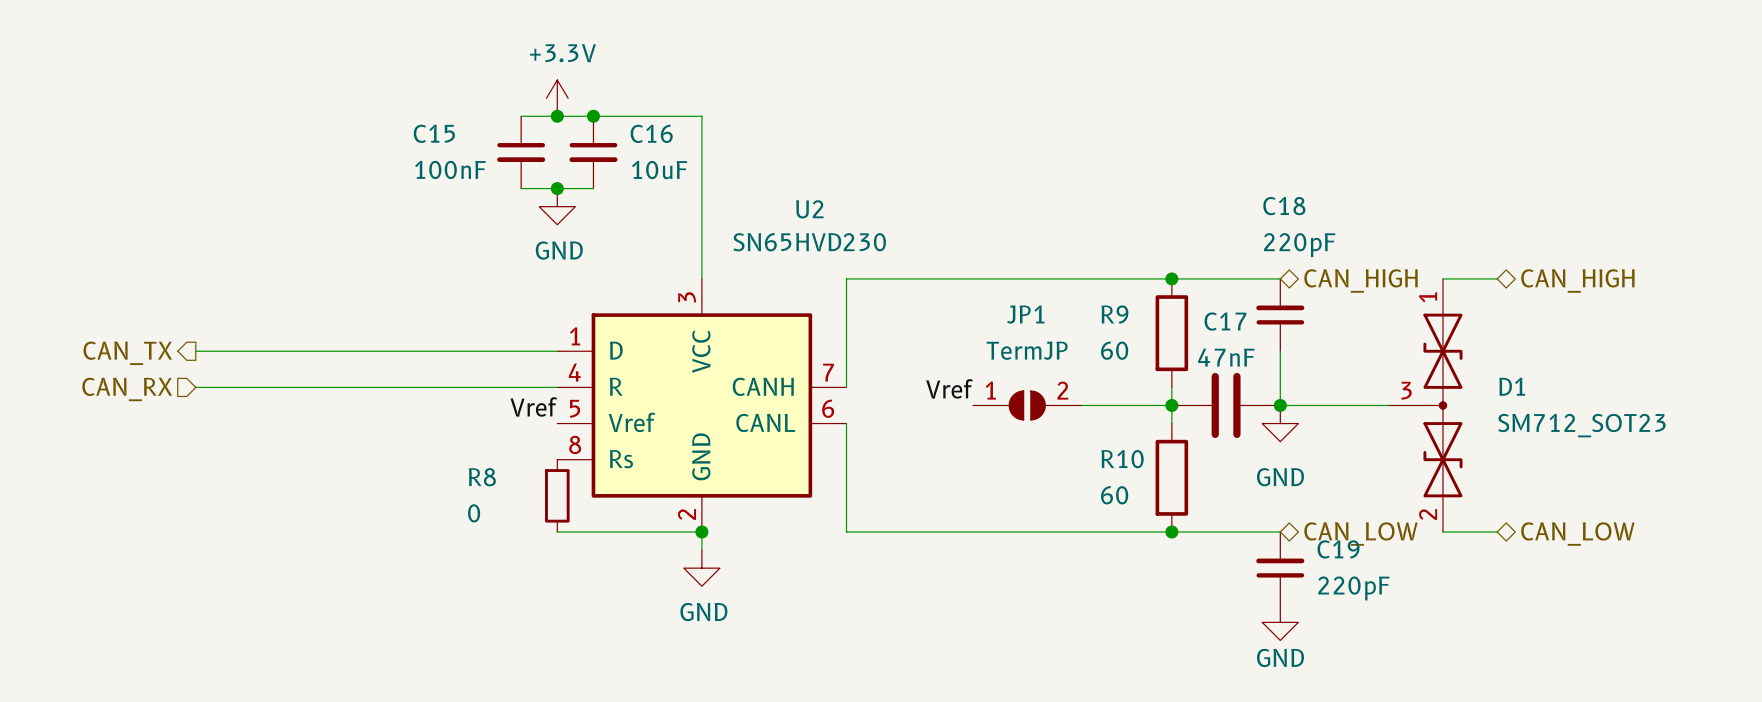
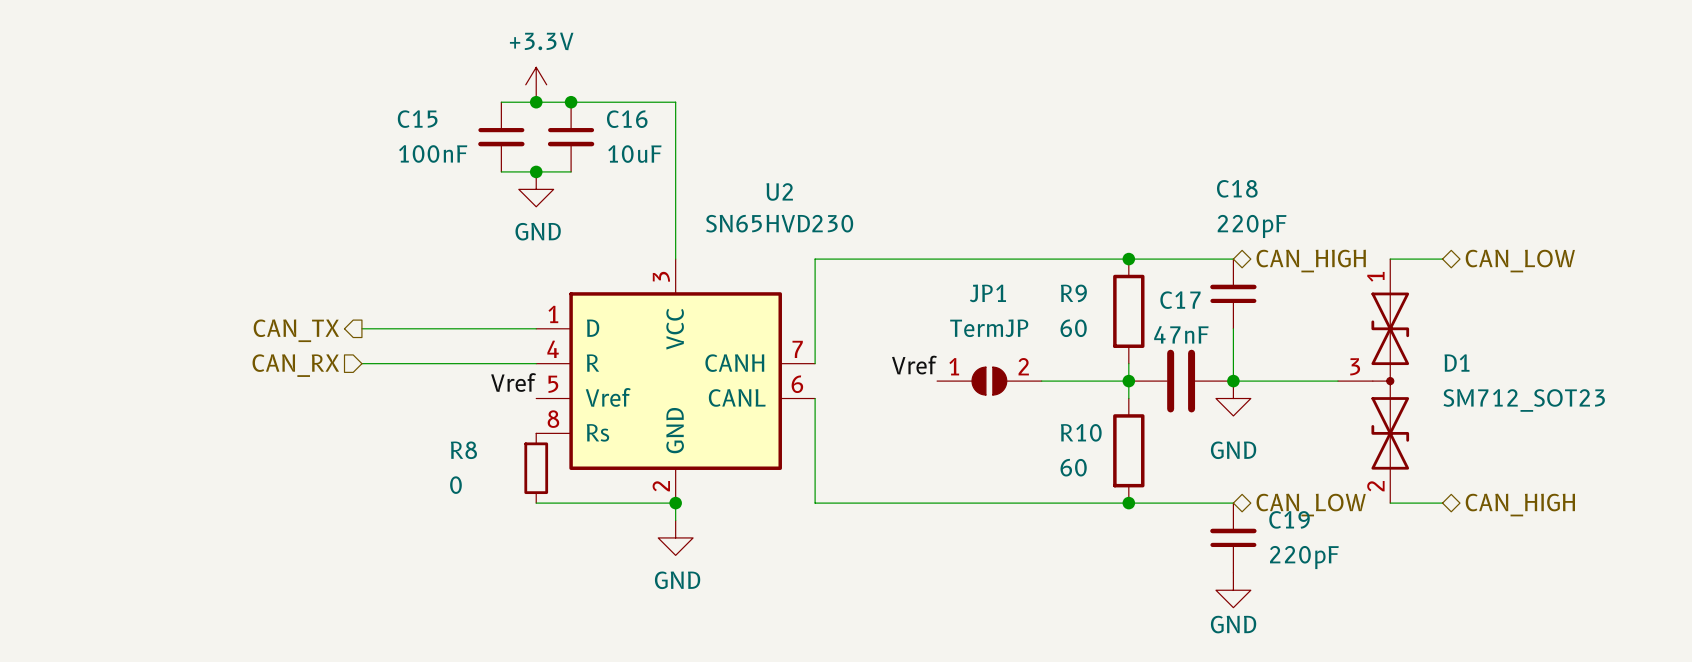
hierarchical label: CAN_HIGH (1577, 280) -> CAN_LOW (1520, 261)
wire: (195, 351) (376, 351) -> none
hierarchical label position: CAN_TX (127, 353) -> CAN_TX (296, 330)
wire: (195, 387) (376, 387) -> none
hierarchical label position: CAN_RX (127, 389) -> CAN_RX (295, 365)
hierarchical label: CAN_LOW (1577, 534) -> CAN_HIGH (1520, 505)

